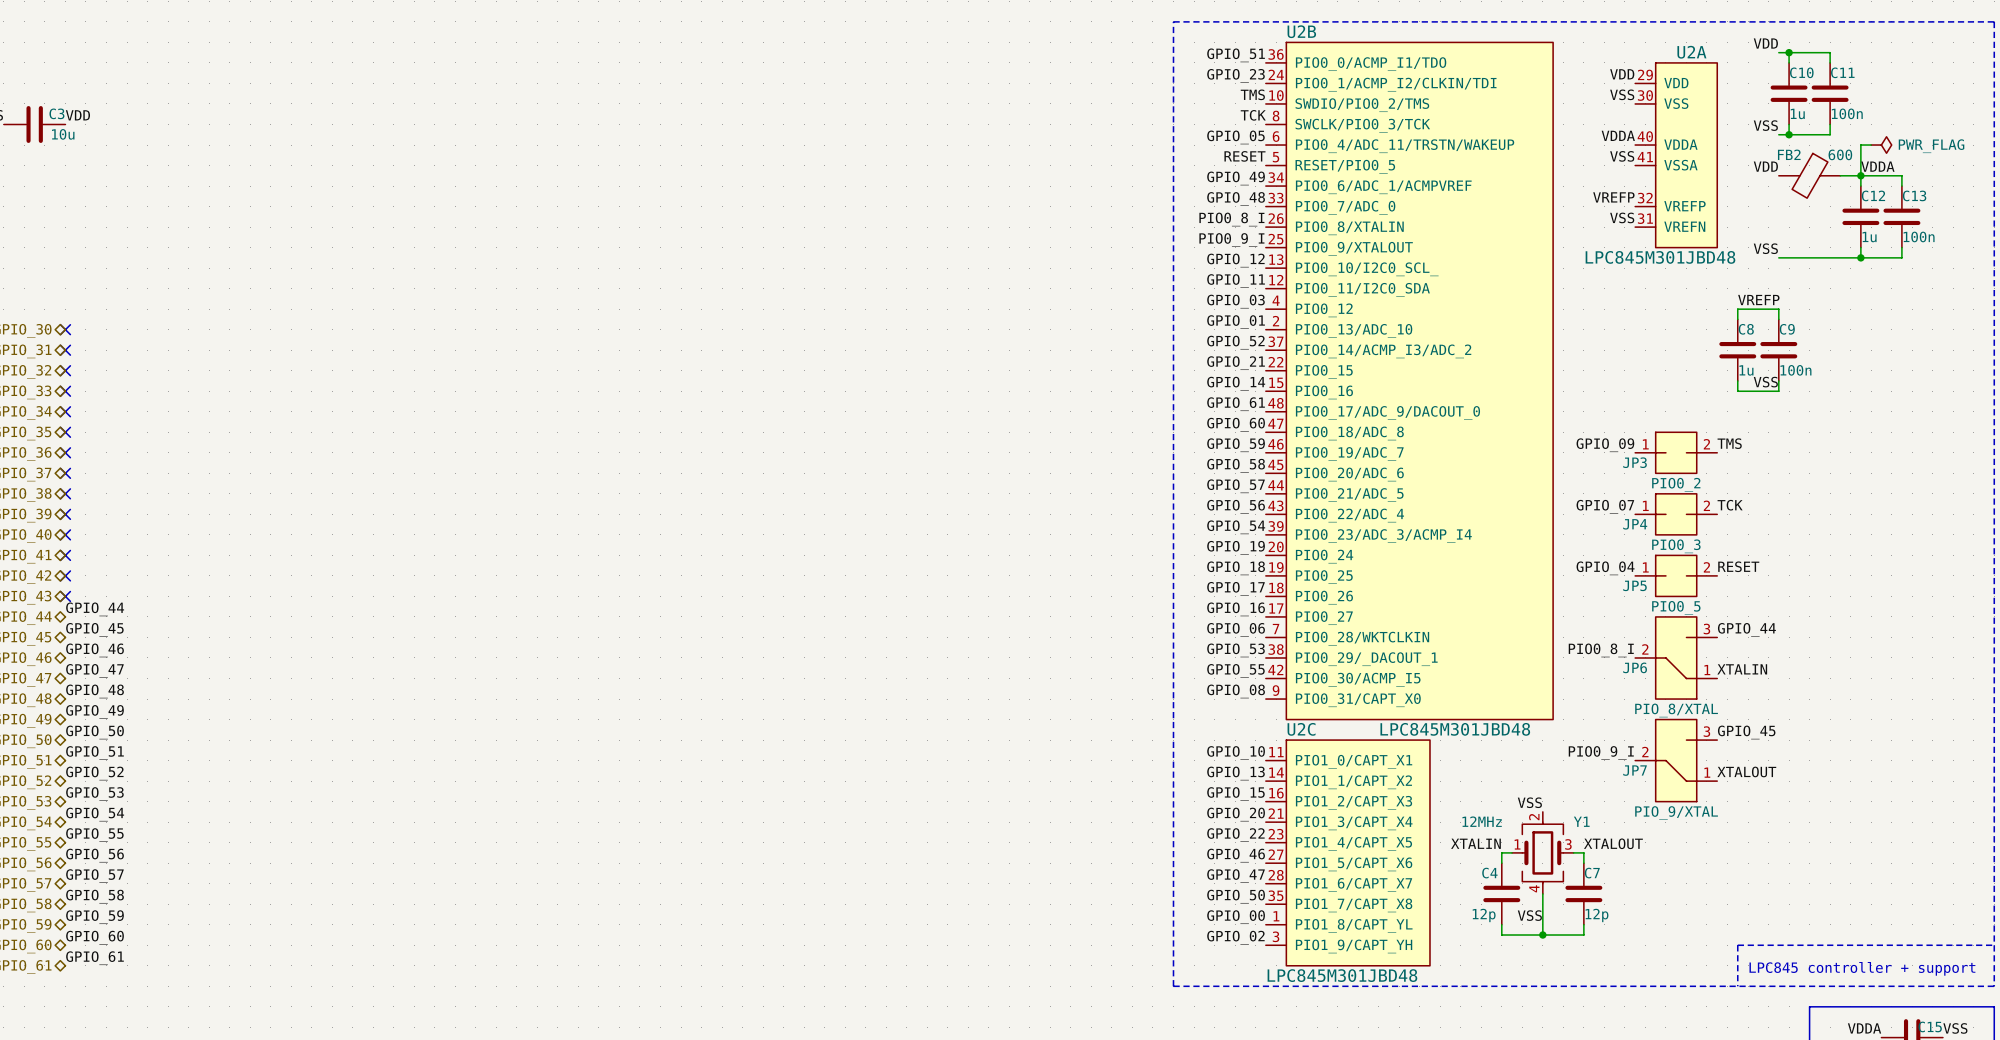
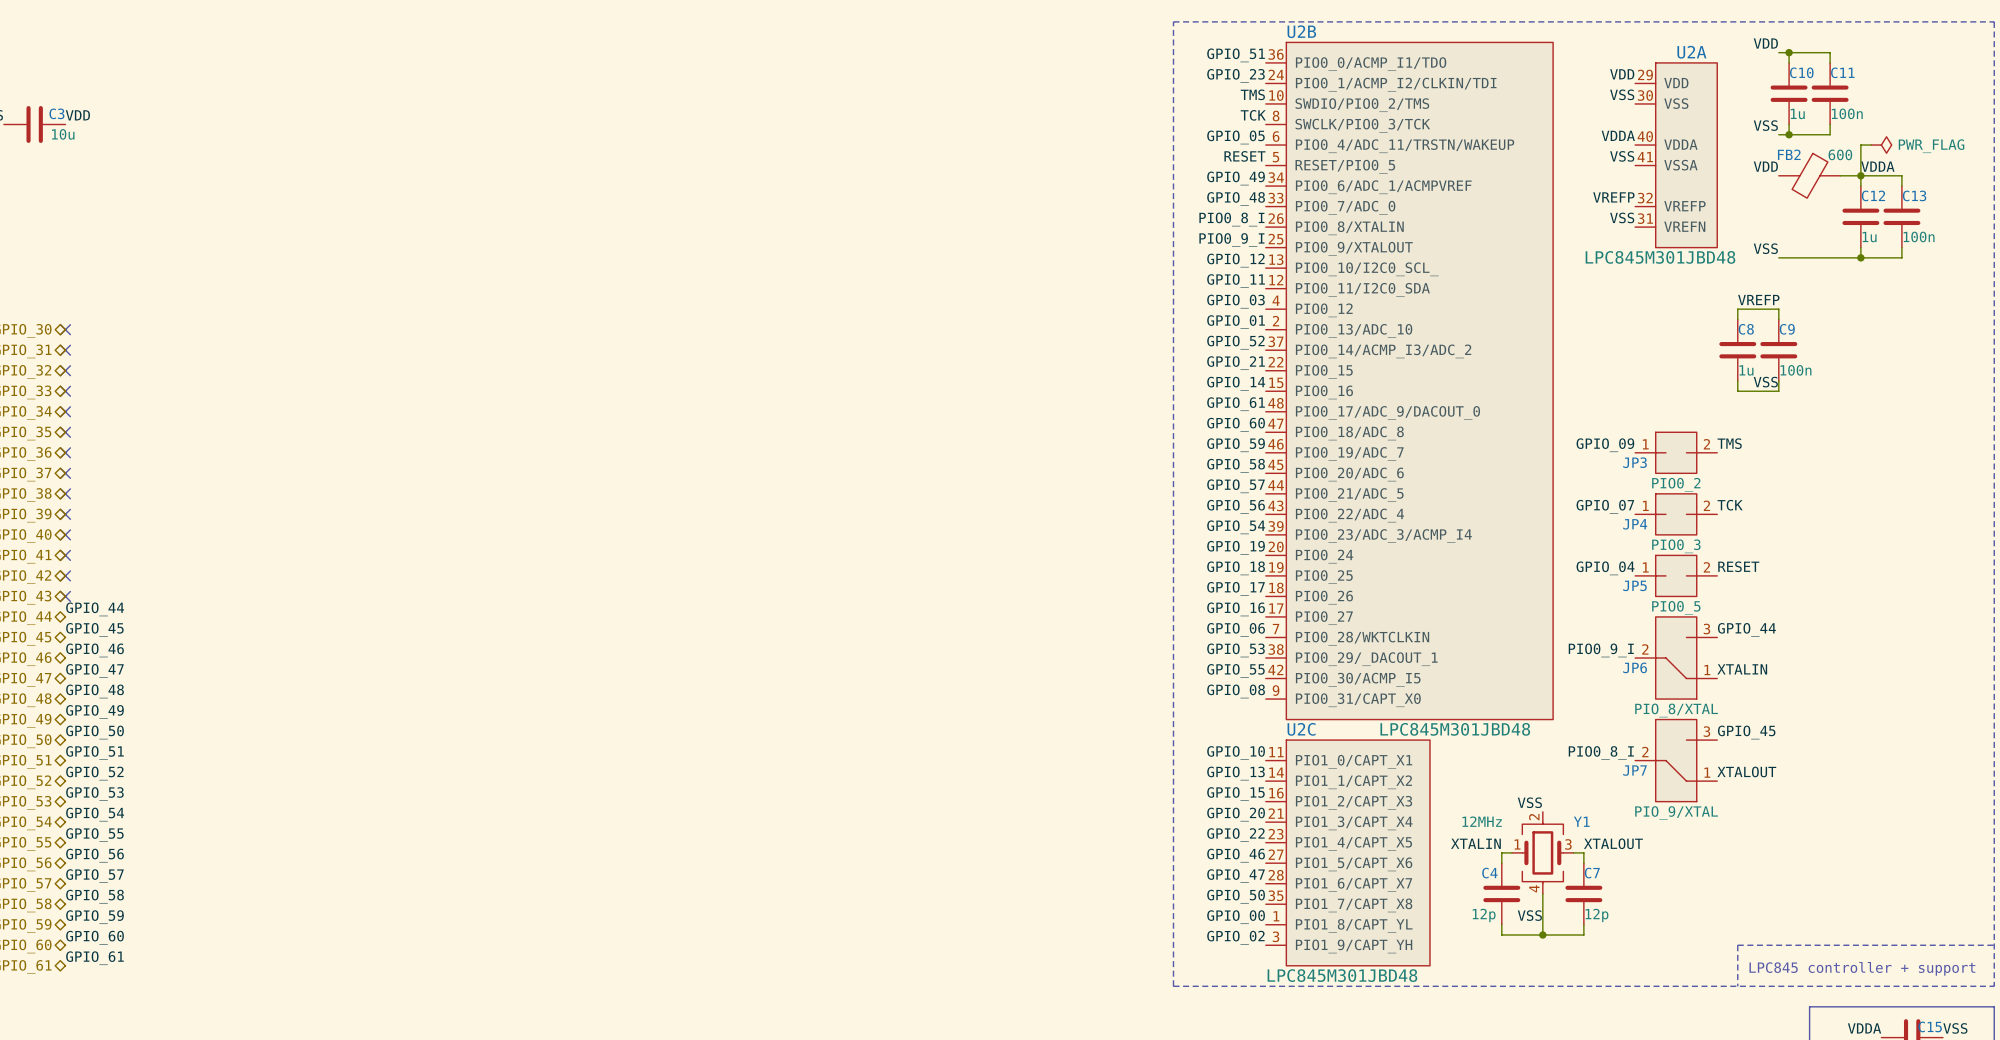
label: PIO0_8_I (1601, 650) -> PIO0_9_I (1601, 650)
label: PIO0_9_I (1601, 753) -> PIO0_8_I (1601, 753)

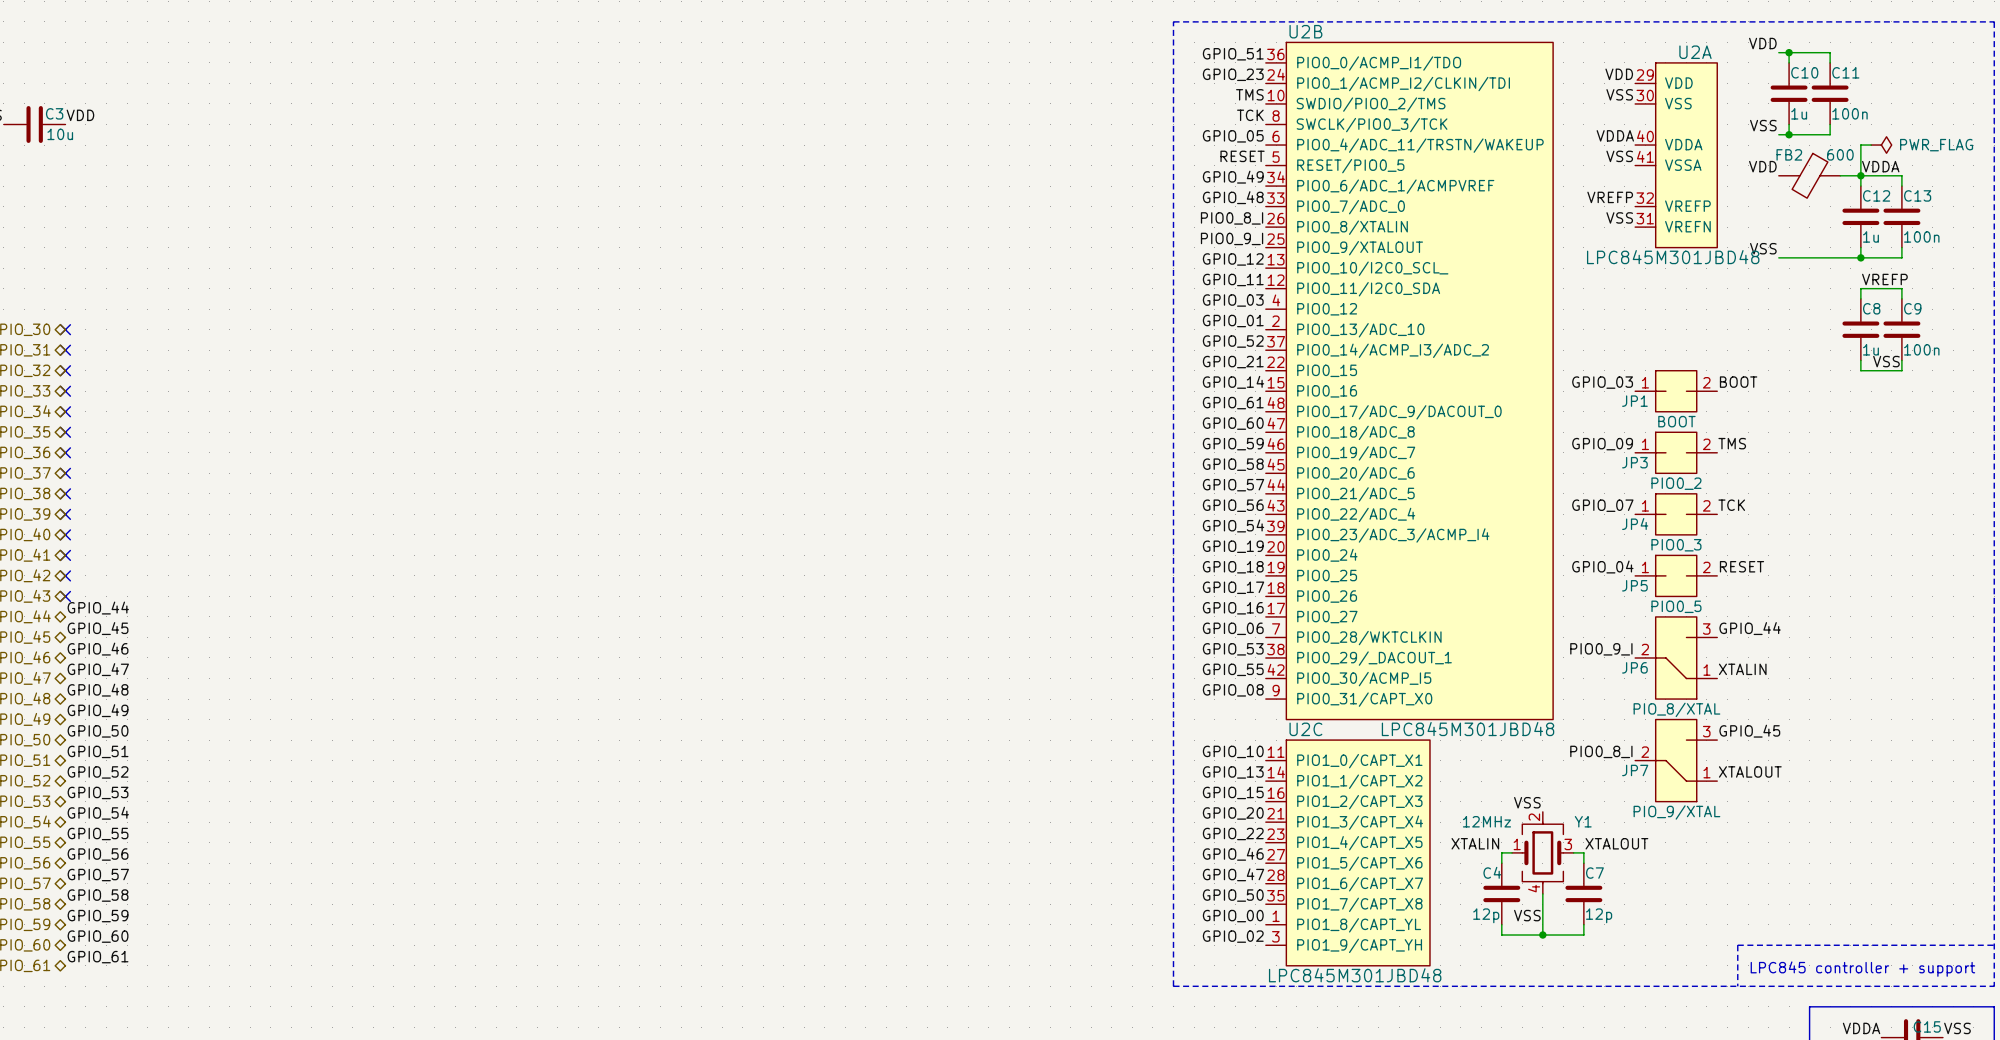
label position: VREFP (1758, 300) -> VREFP (1884, 279)
wire: (1737, 319) (1737, 309) (1778, 309) (1778, 319) -> (1860, 298) (1860, 288) (1901, 288) (1901, 298)
C8 position: (1737, 350) -> (1860, 329)
C9 position: (1778, 350) -> (1901, 329)
wire: (1737, 380) (1737, 391) (1778, 391) (1778, 380) -> (1860, 360) (1860, 370) (1901, 370) (1901, 360)
label: none -> BOOT (1738, 382)
label position: VSS (1765, 382) -> VSS (1886, 361)
label: none -> GPIO_03 (1602, 382)
JP1: none -> BOOT (1676, 391)

